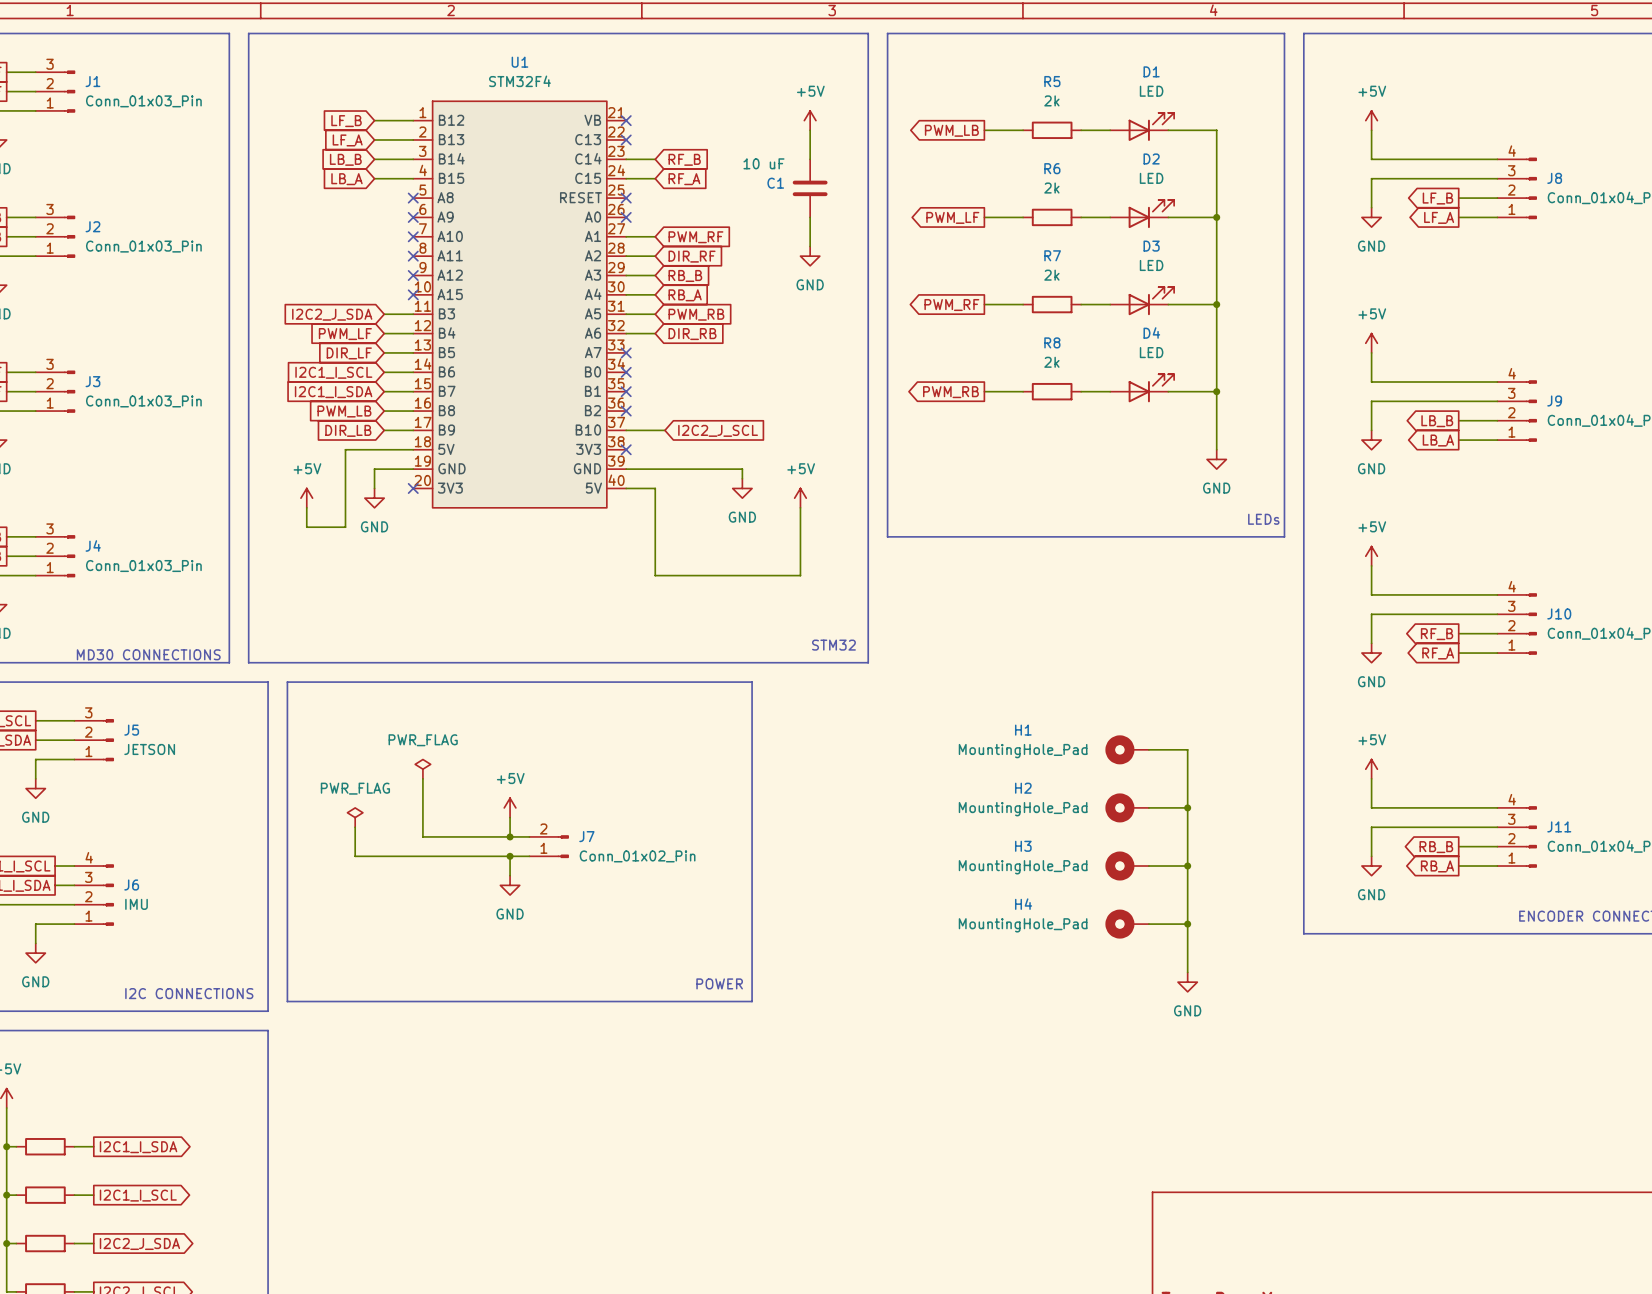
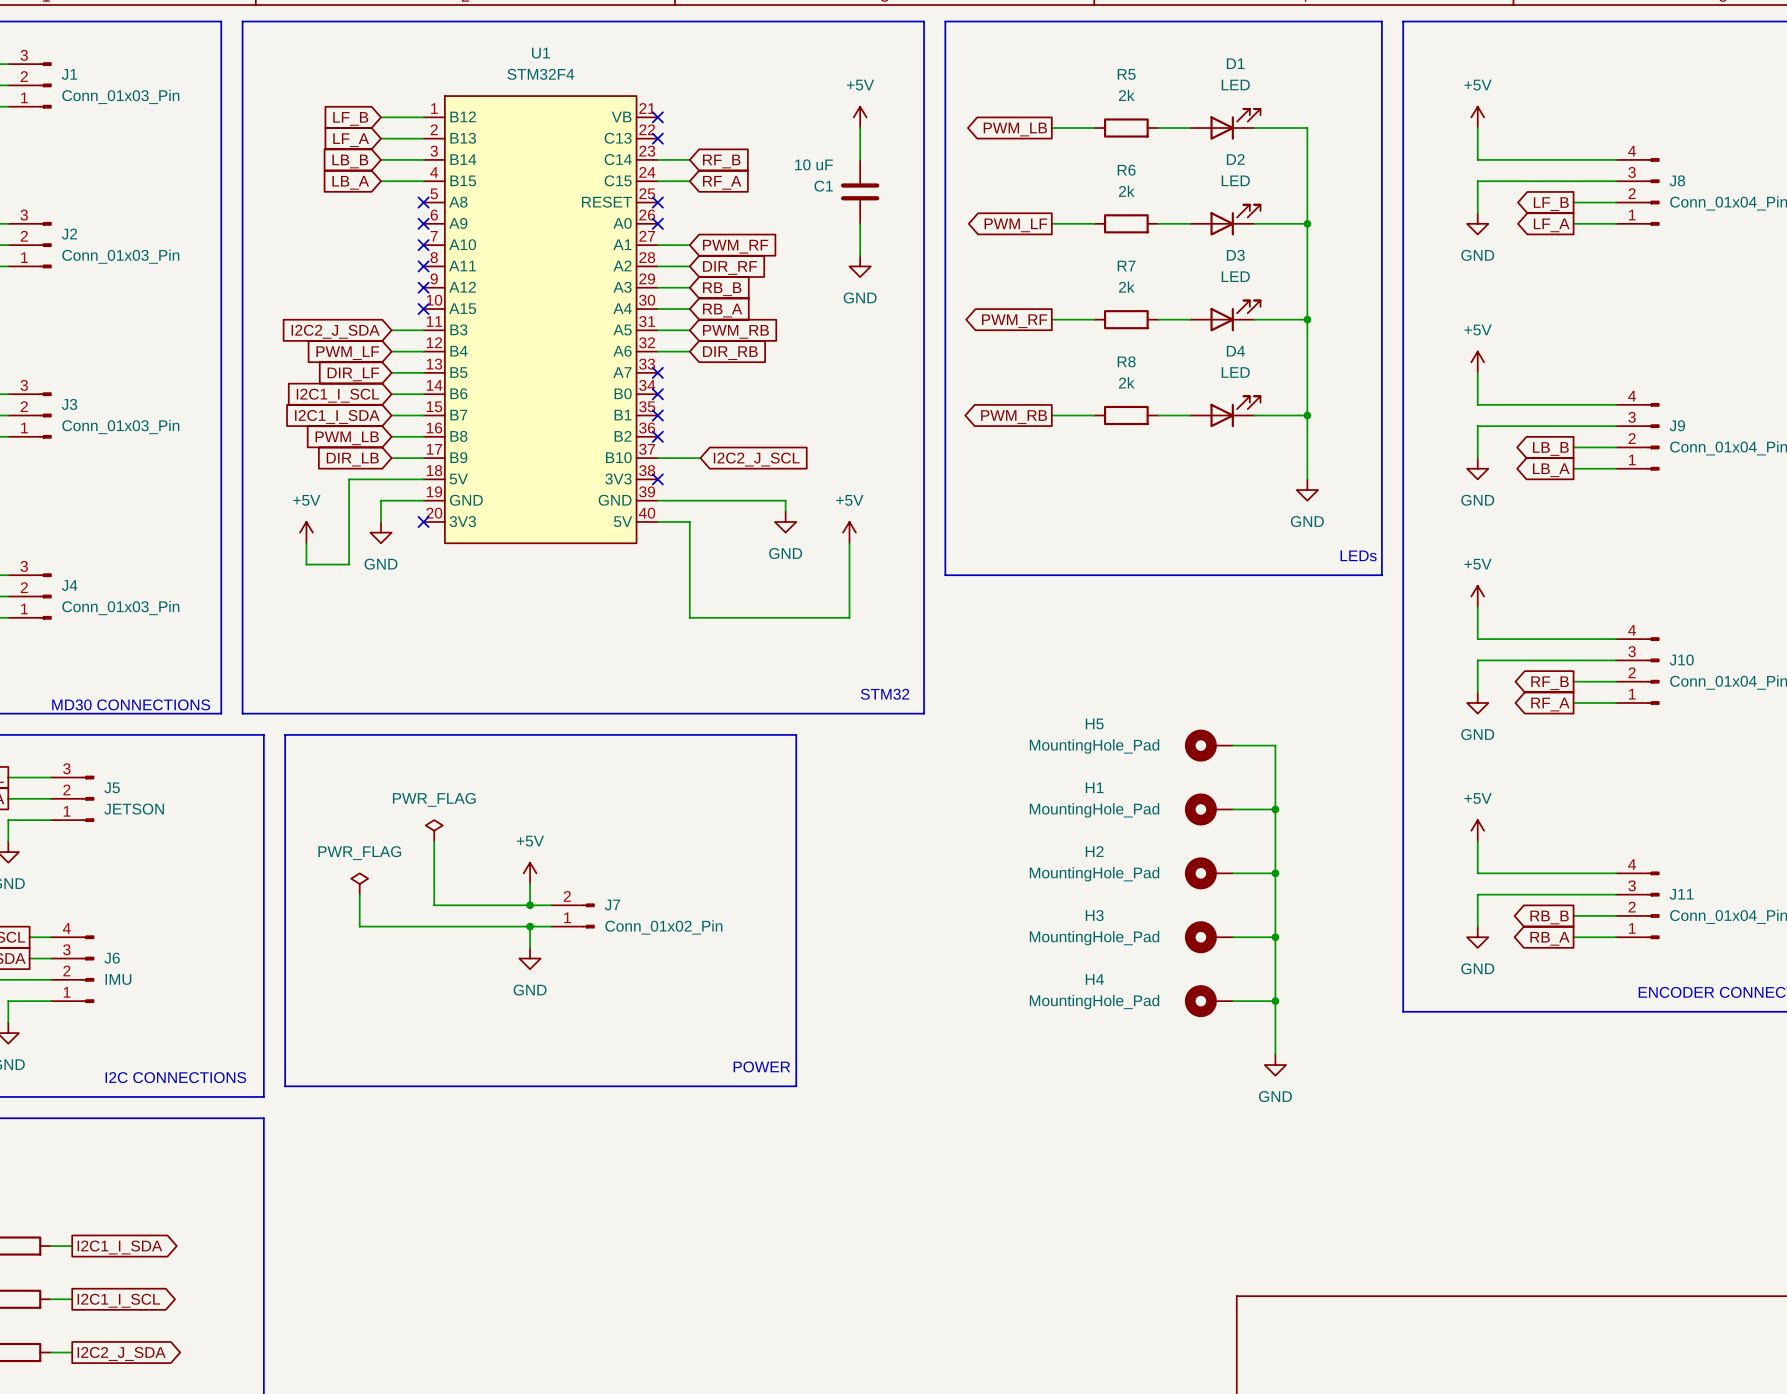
H5: none -> MountingHole_Pad (1208, 745)
wire: none -> (1232, 745) (1275, 745) (1275, 809)
junction: none -> (1275, 809)

